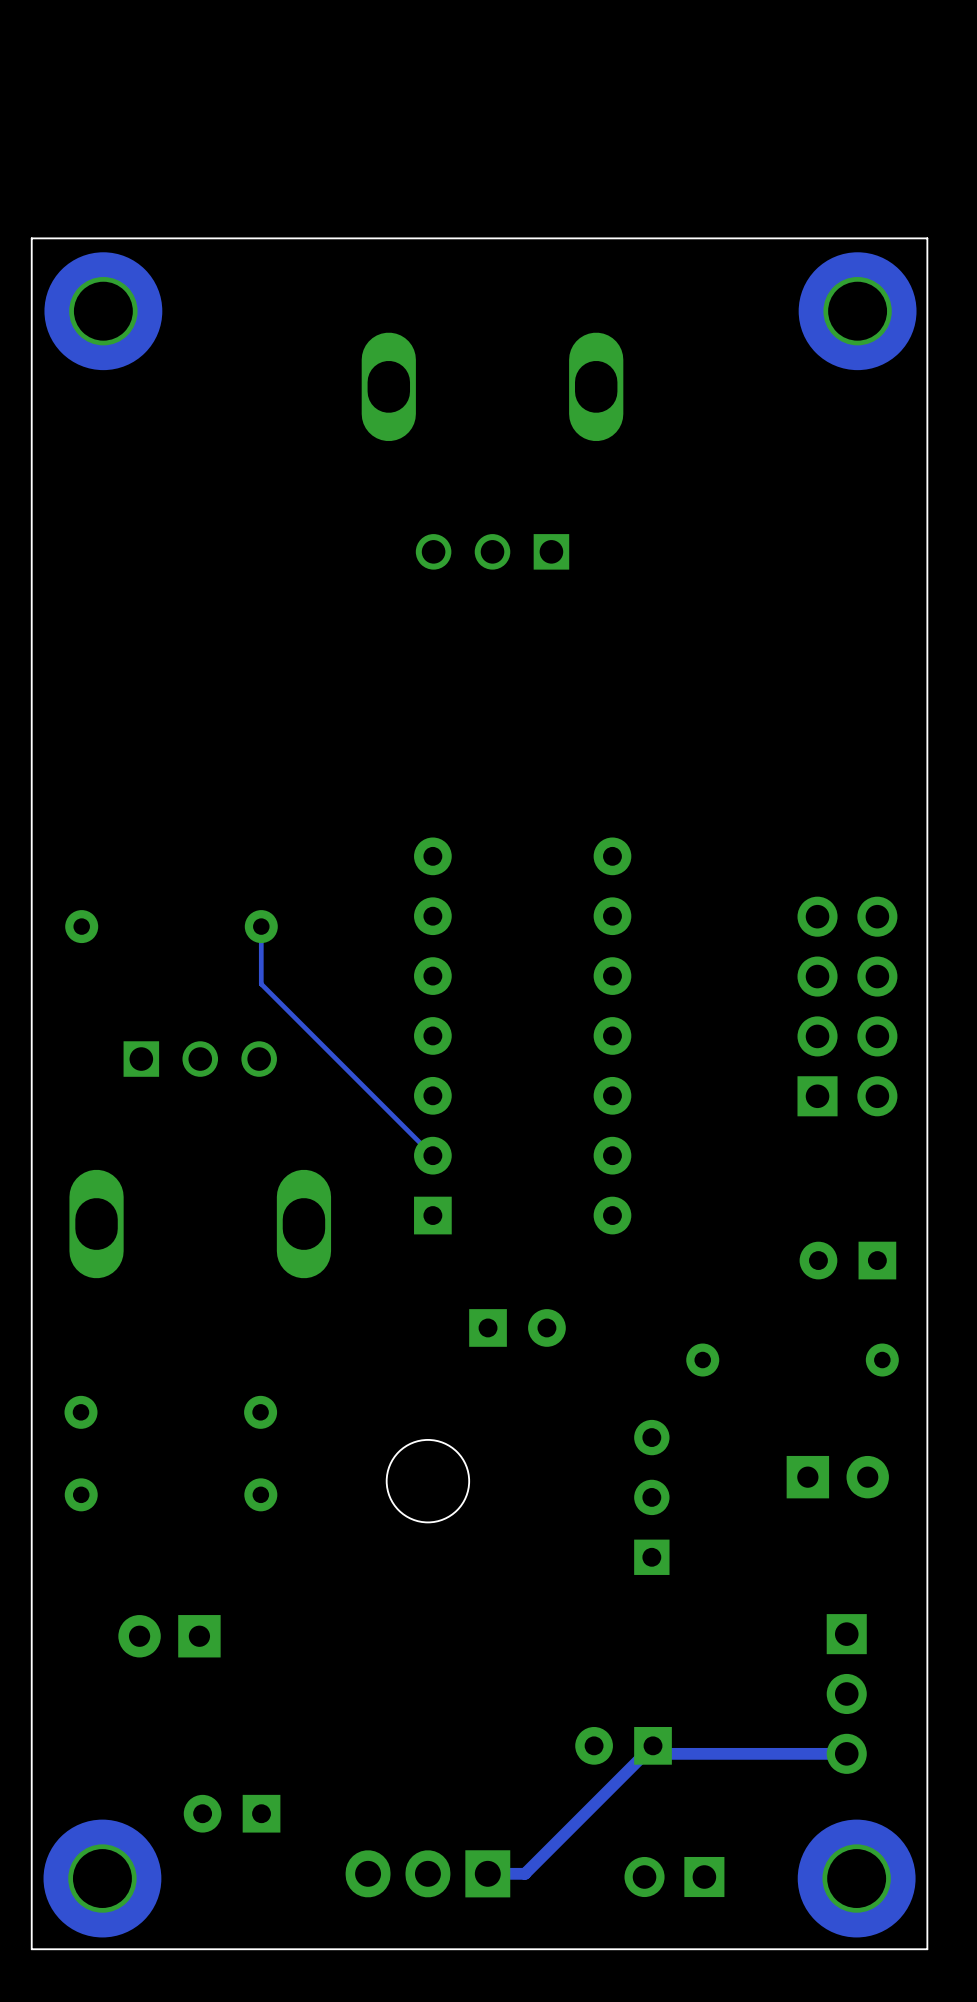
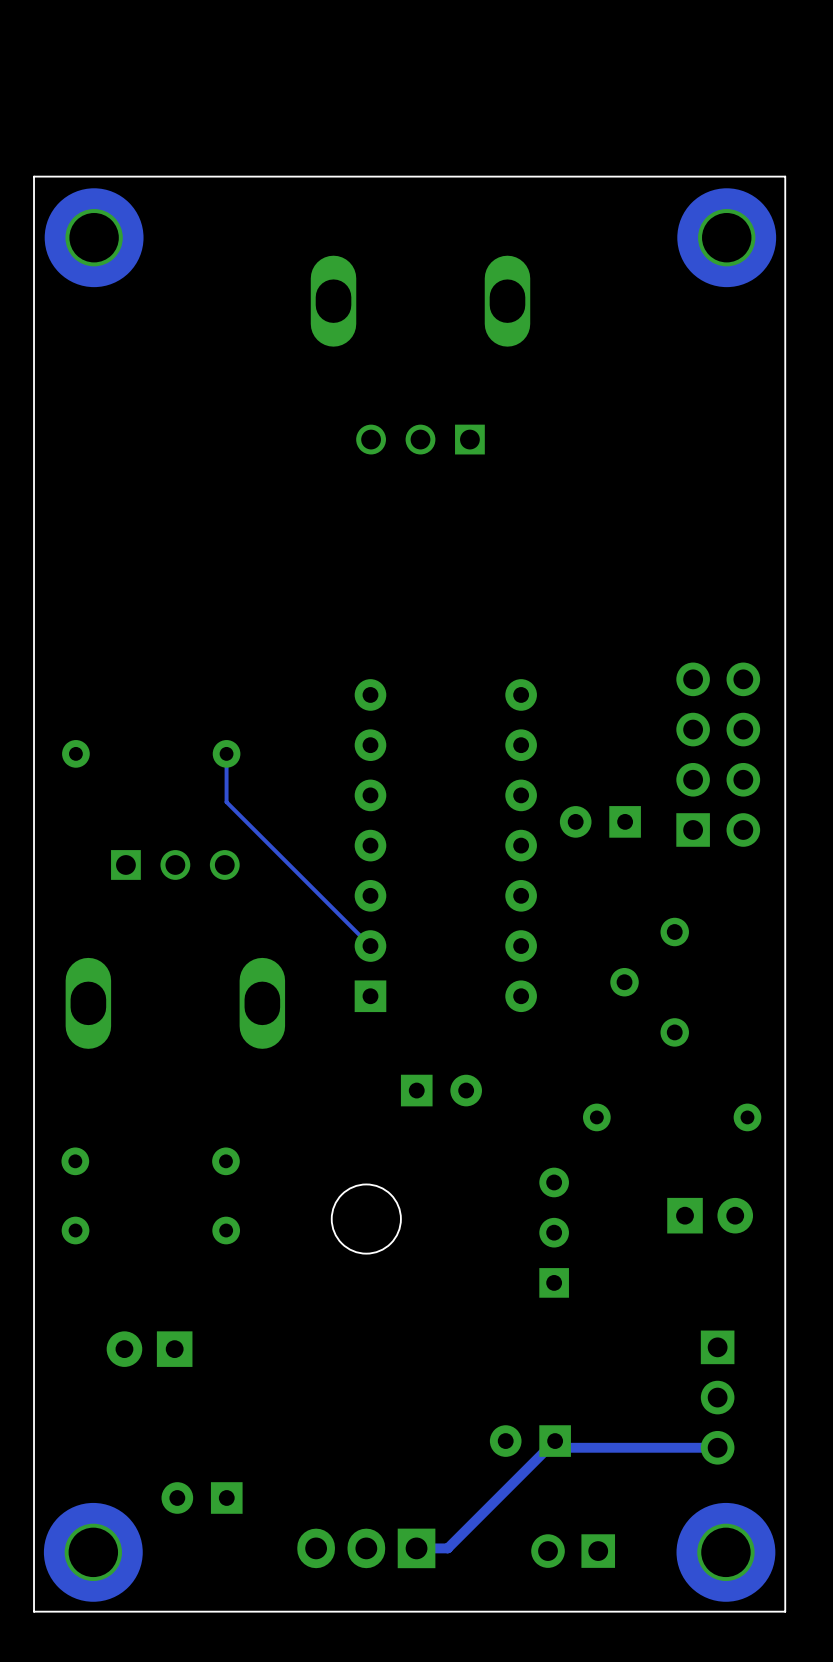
part position: (847, 1006) -> (718, 754)
part: none -> (649, 982)
part position: (847, 1260) -> (600, 821)

